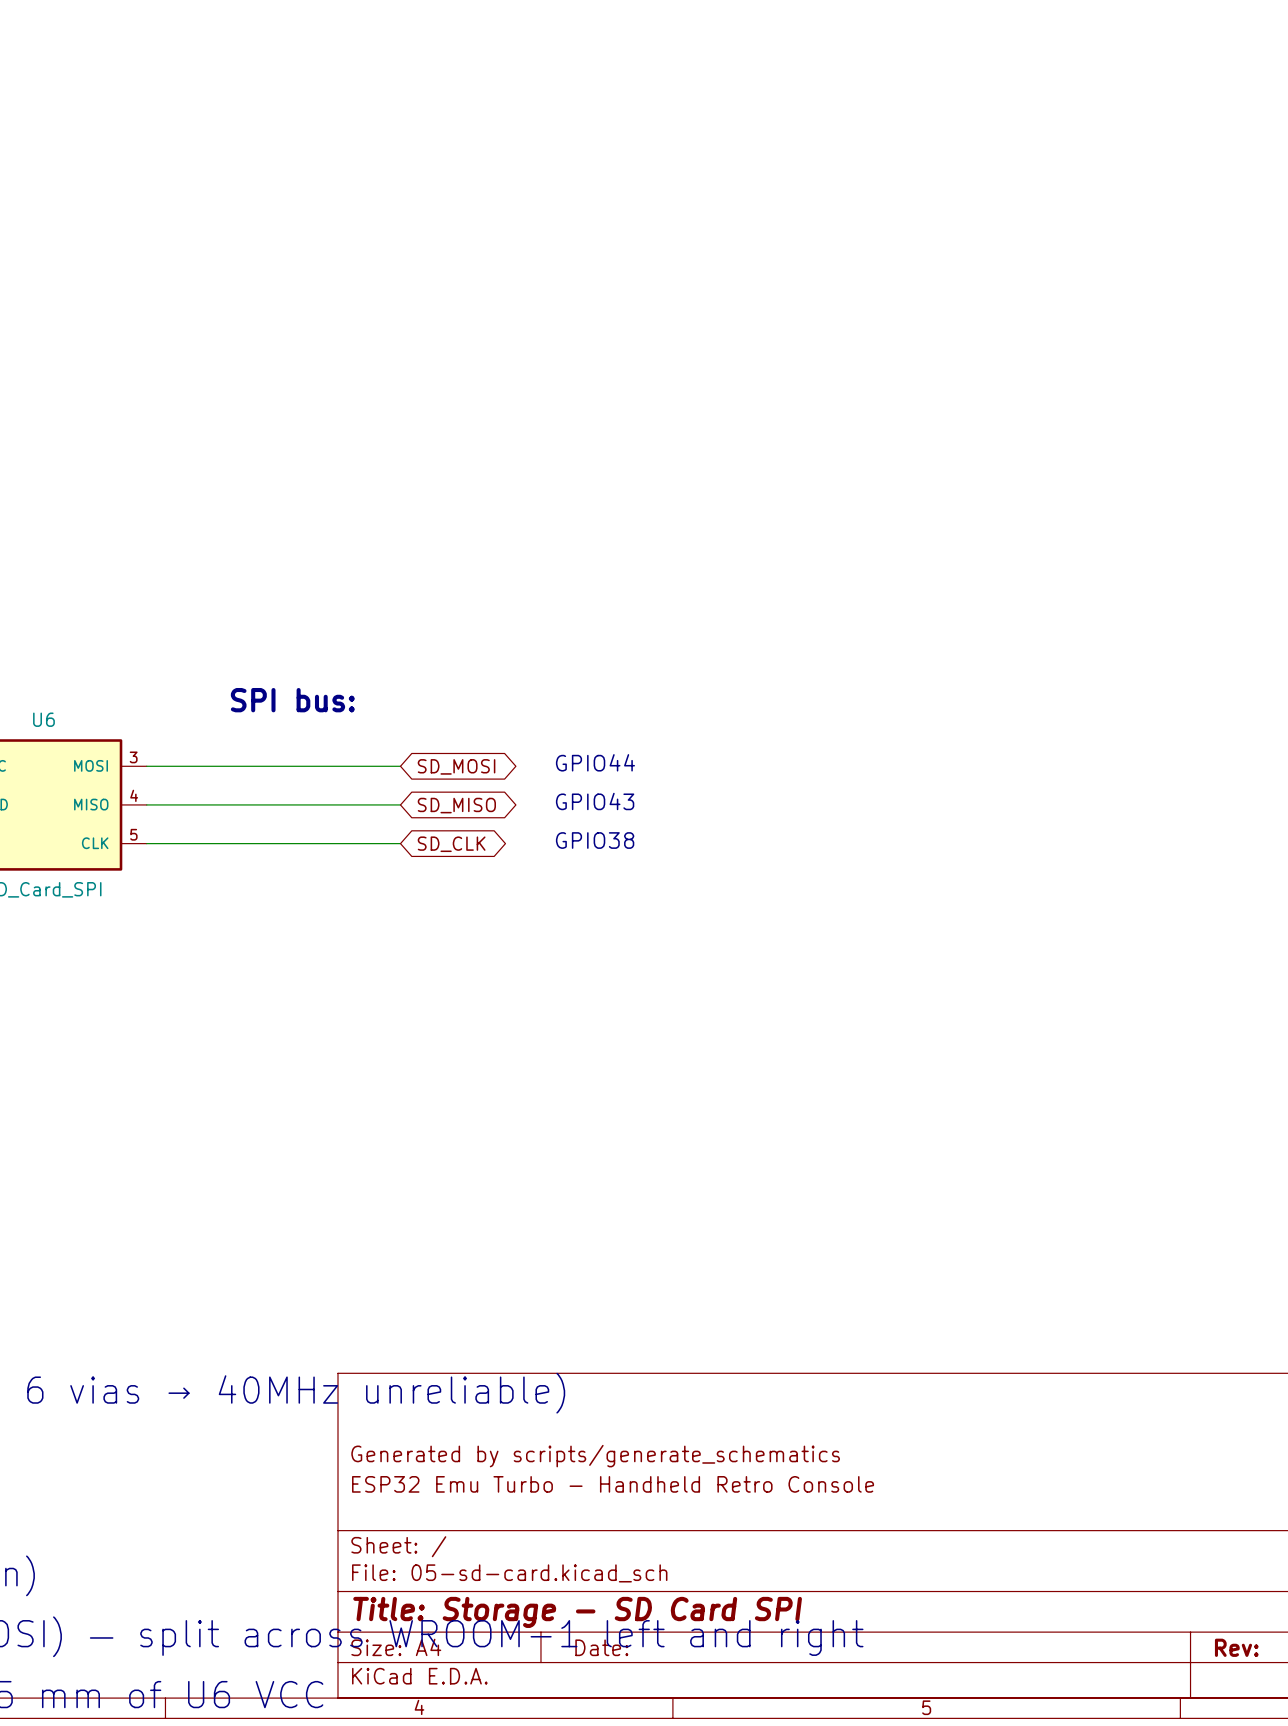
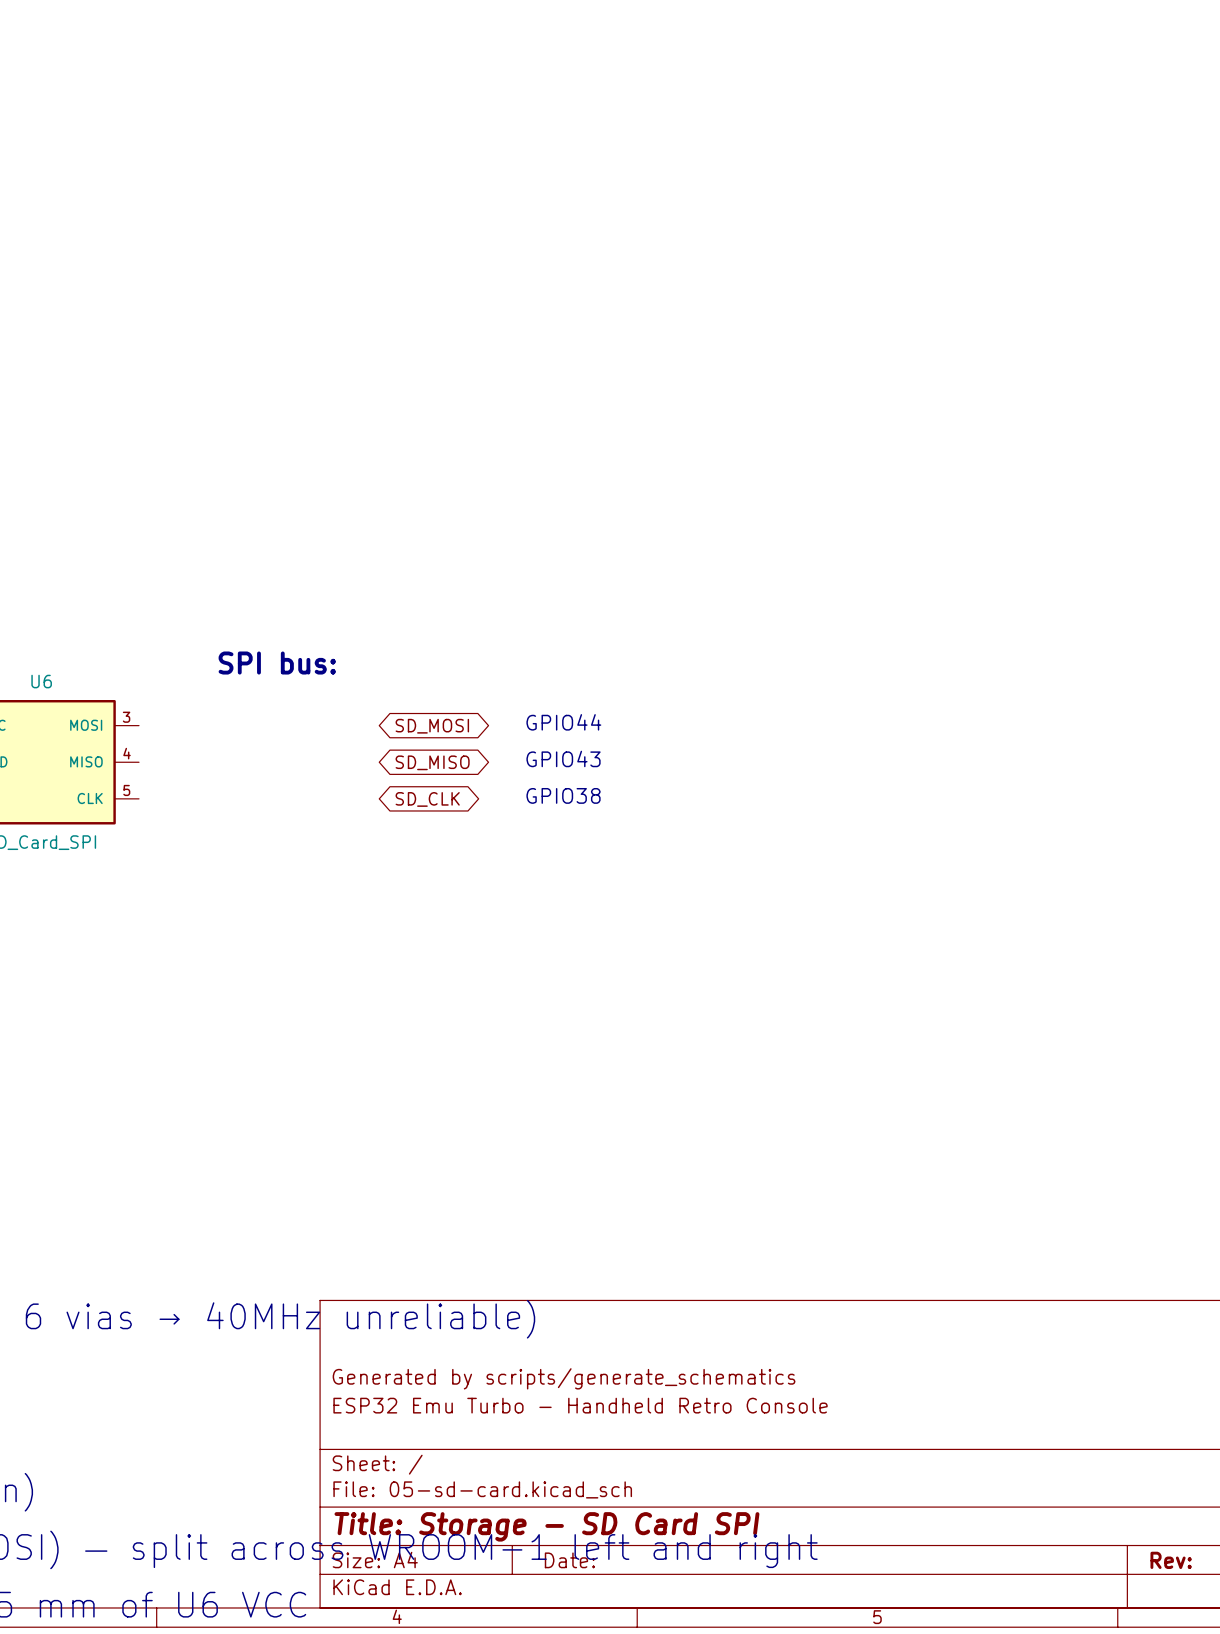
wire: (146, 766) (400, 766) -> none
wire: (146, 804) (400, 804) -> none
wire: (146, 843) (400, 843) -> none

